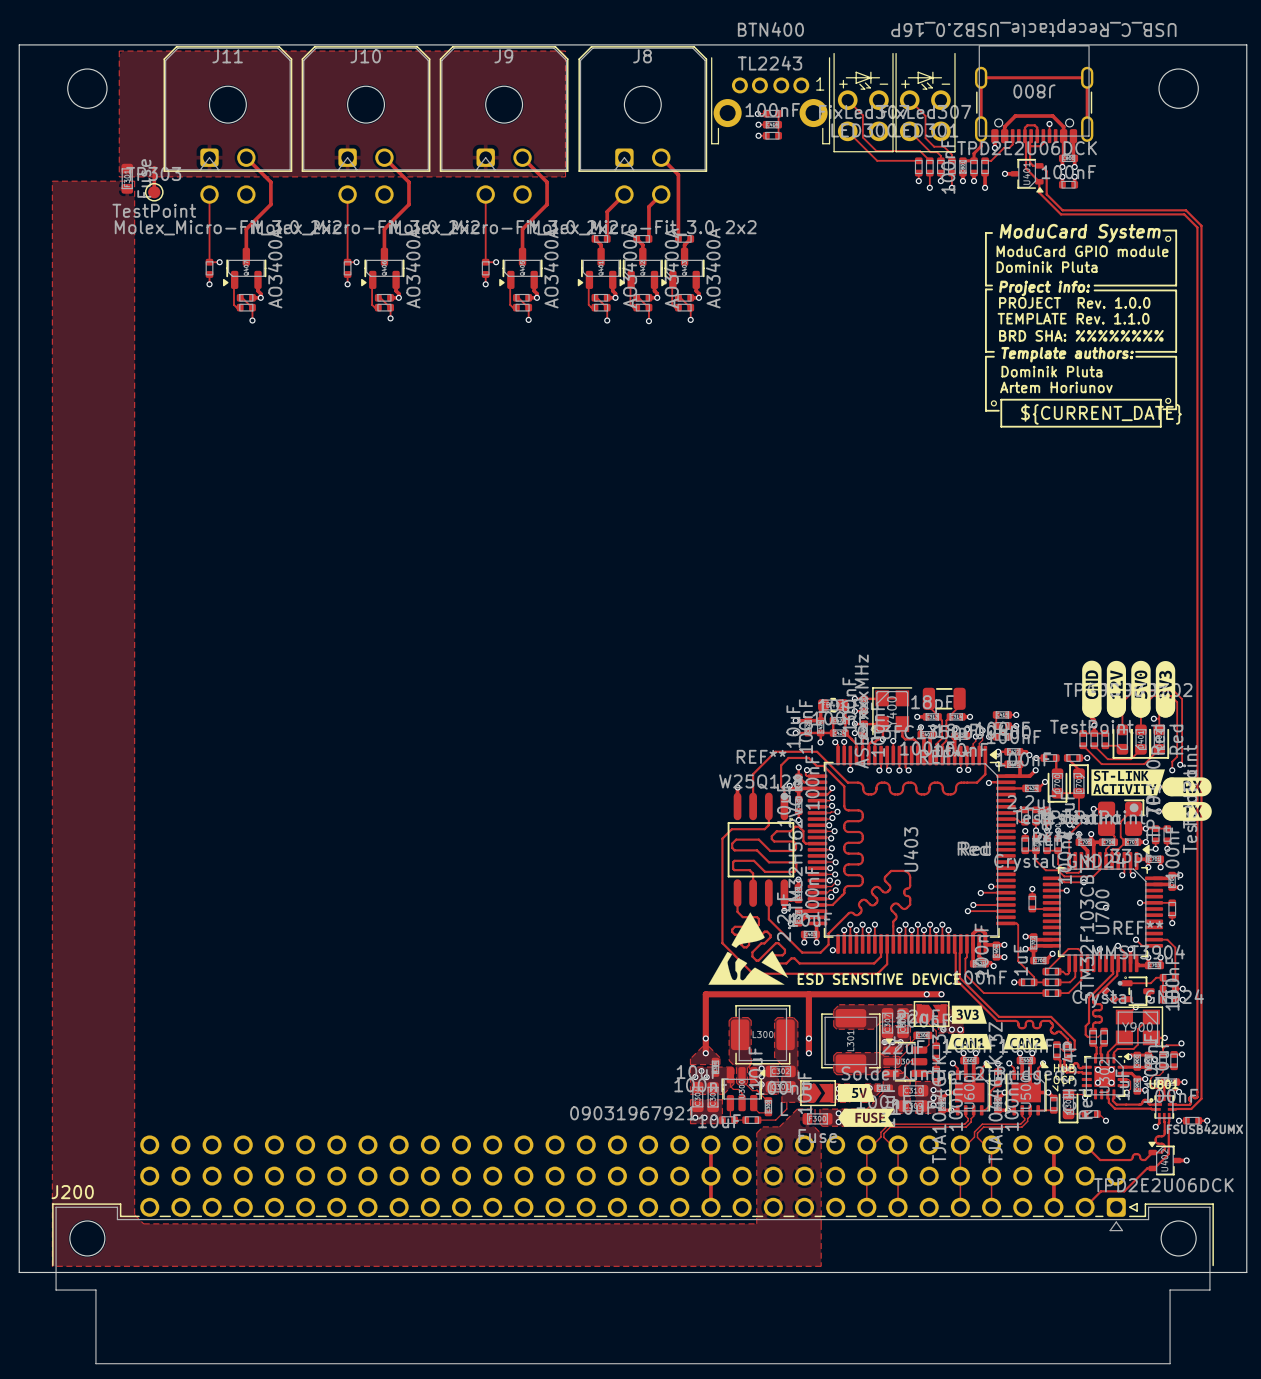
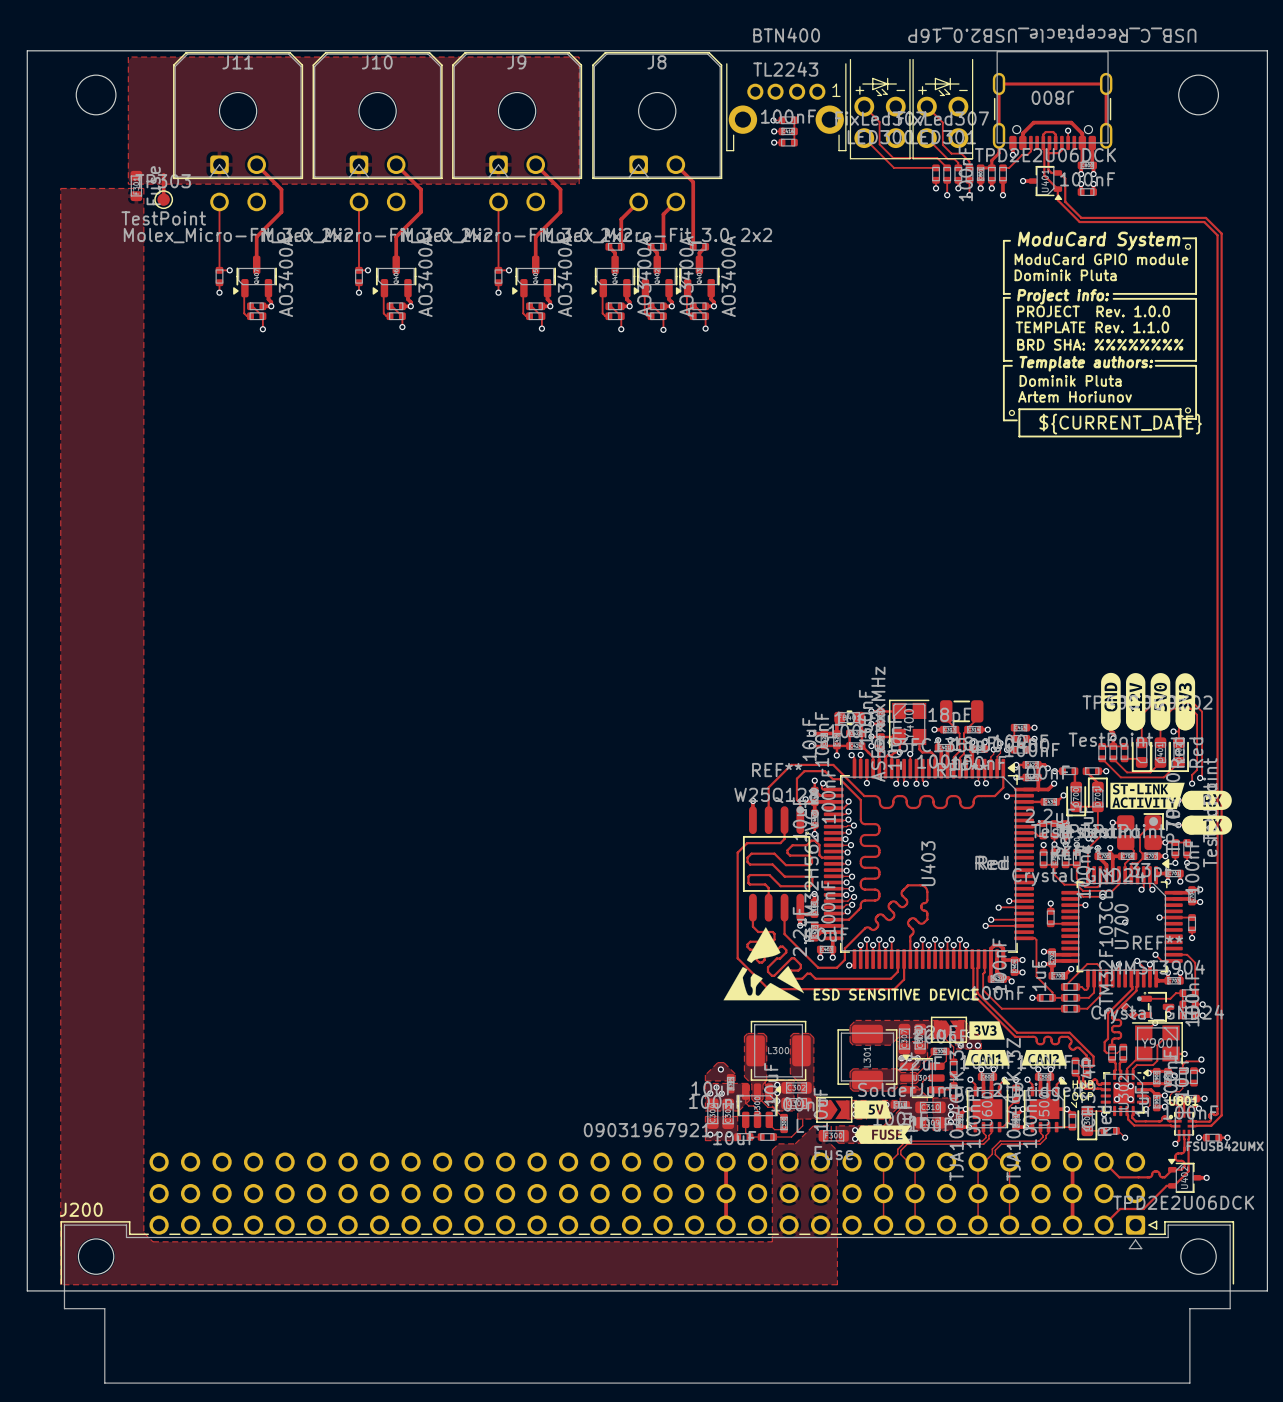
track: (808, 994) (808, 1053) -> none
via: (926, 994) -> none
track: (941, 994) (705, 994) (705, 1053) -> none
via: (941, 994) -> none
via: (705, 1038) -> none
via: (808, 1038) -> none
via: (808, 1053) -> none

